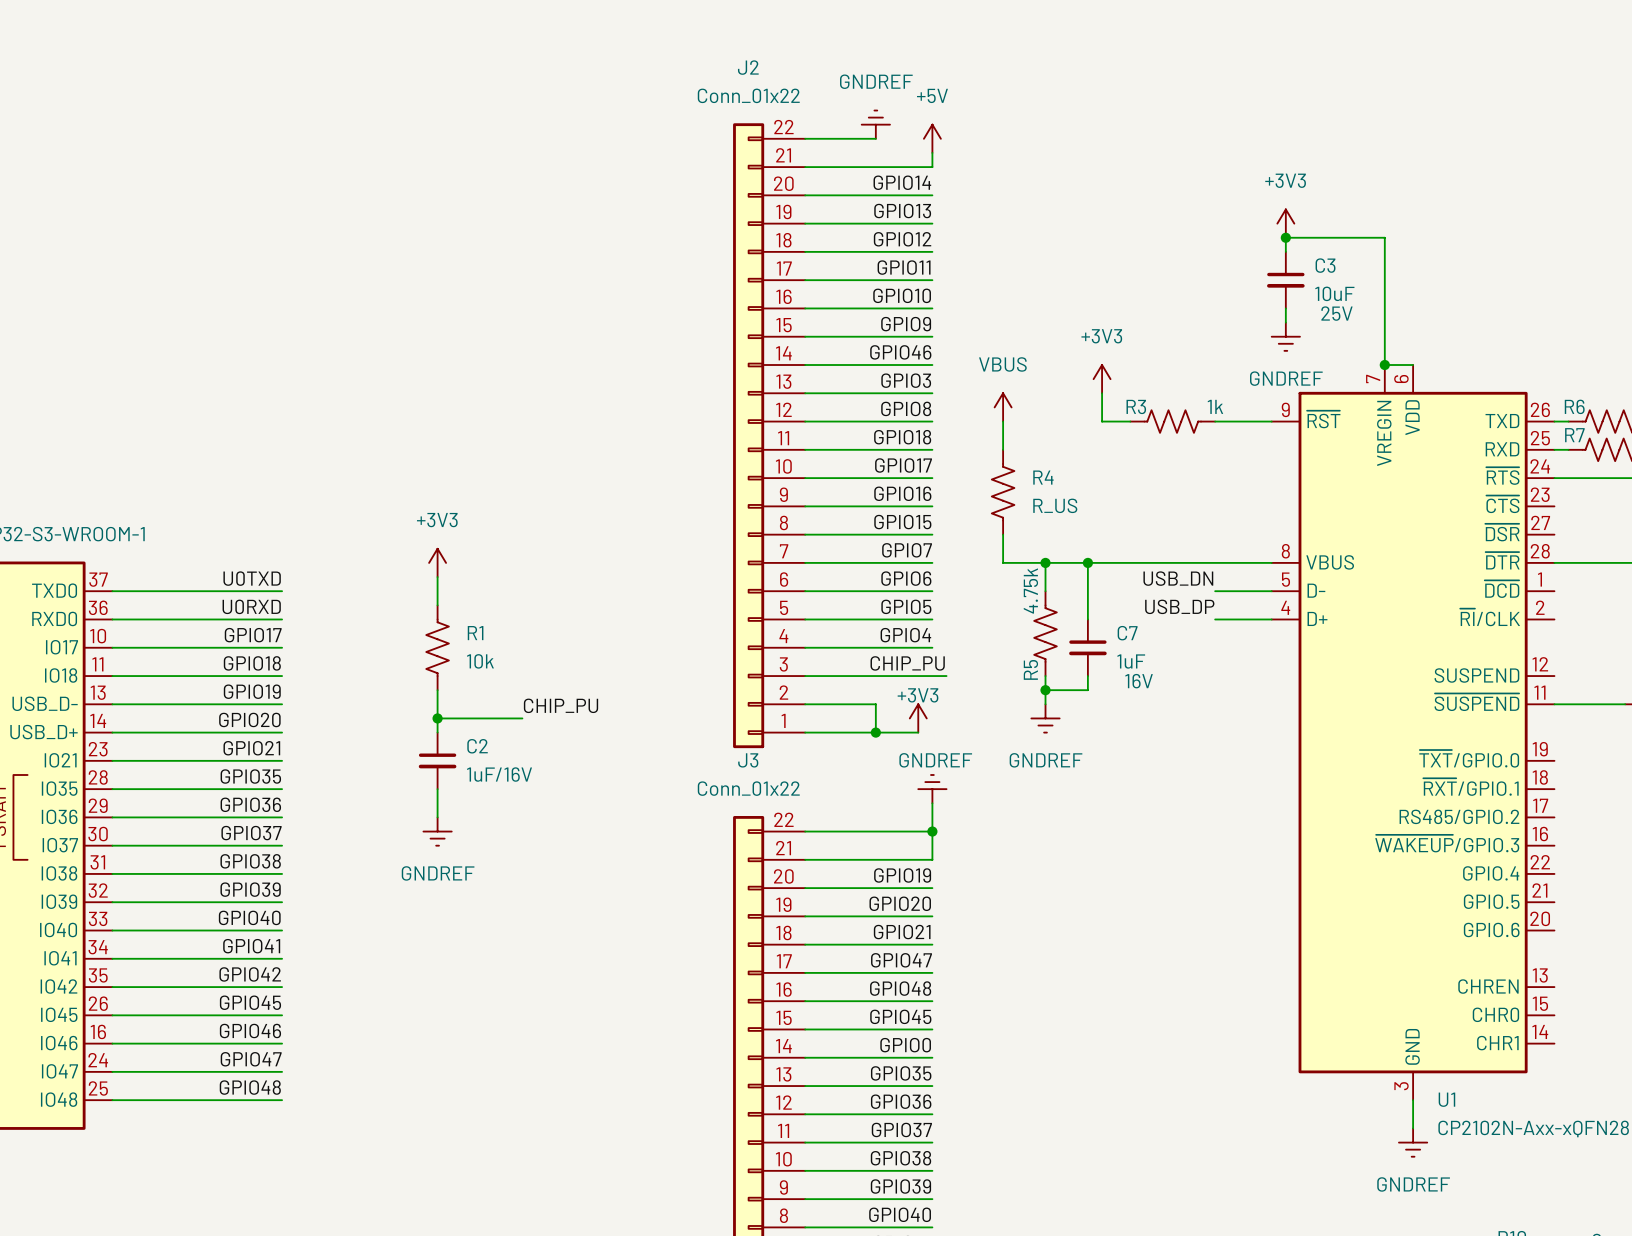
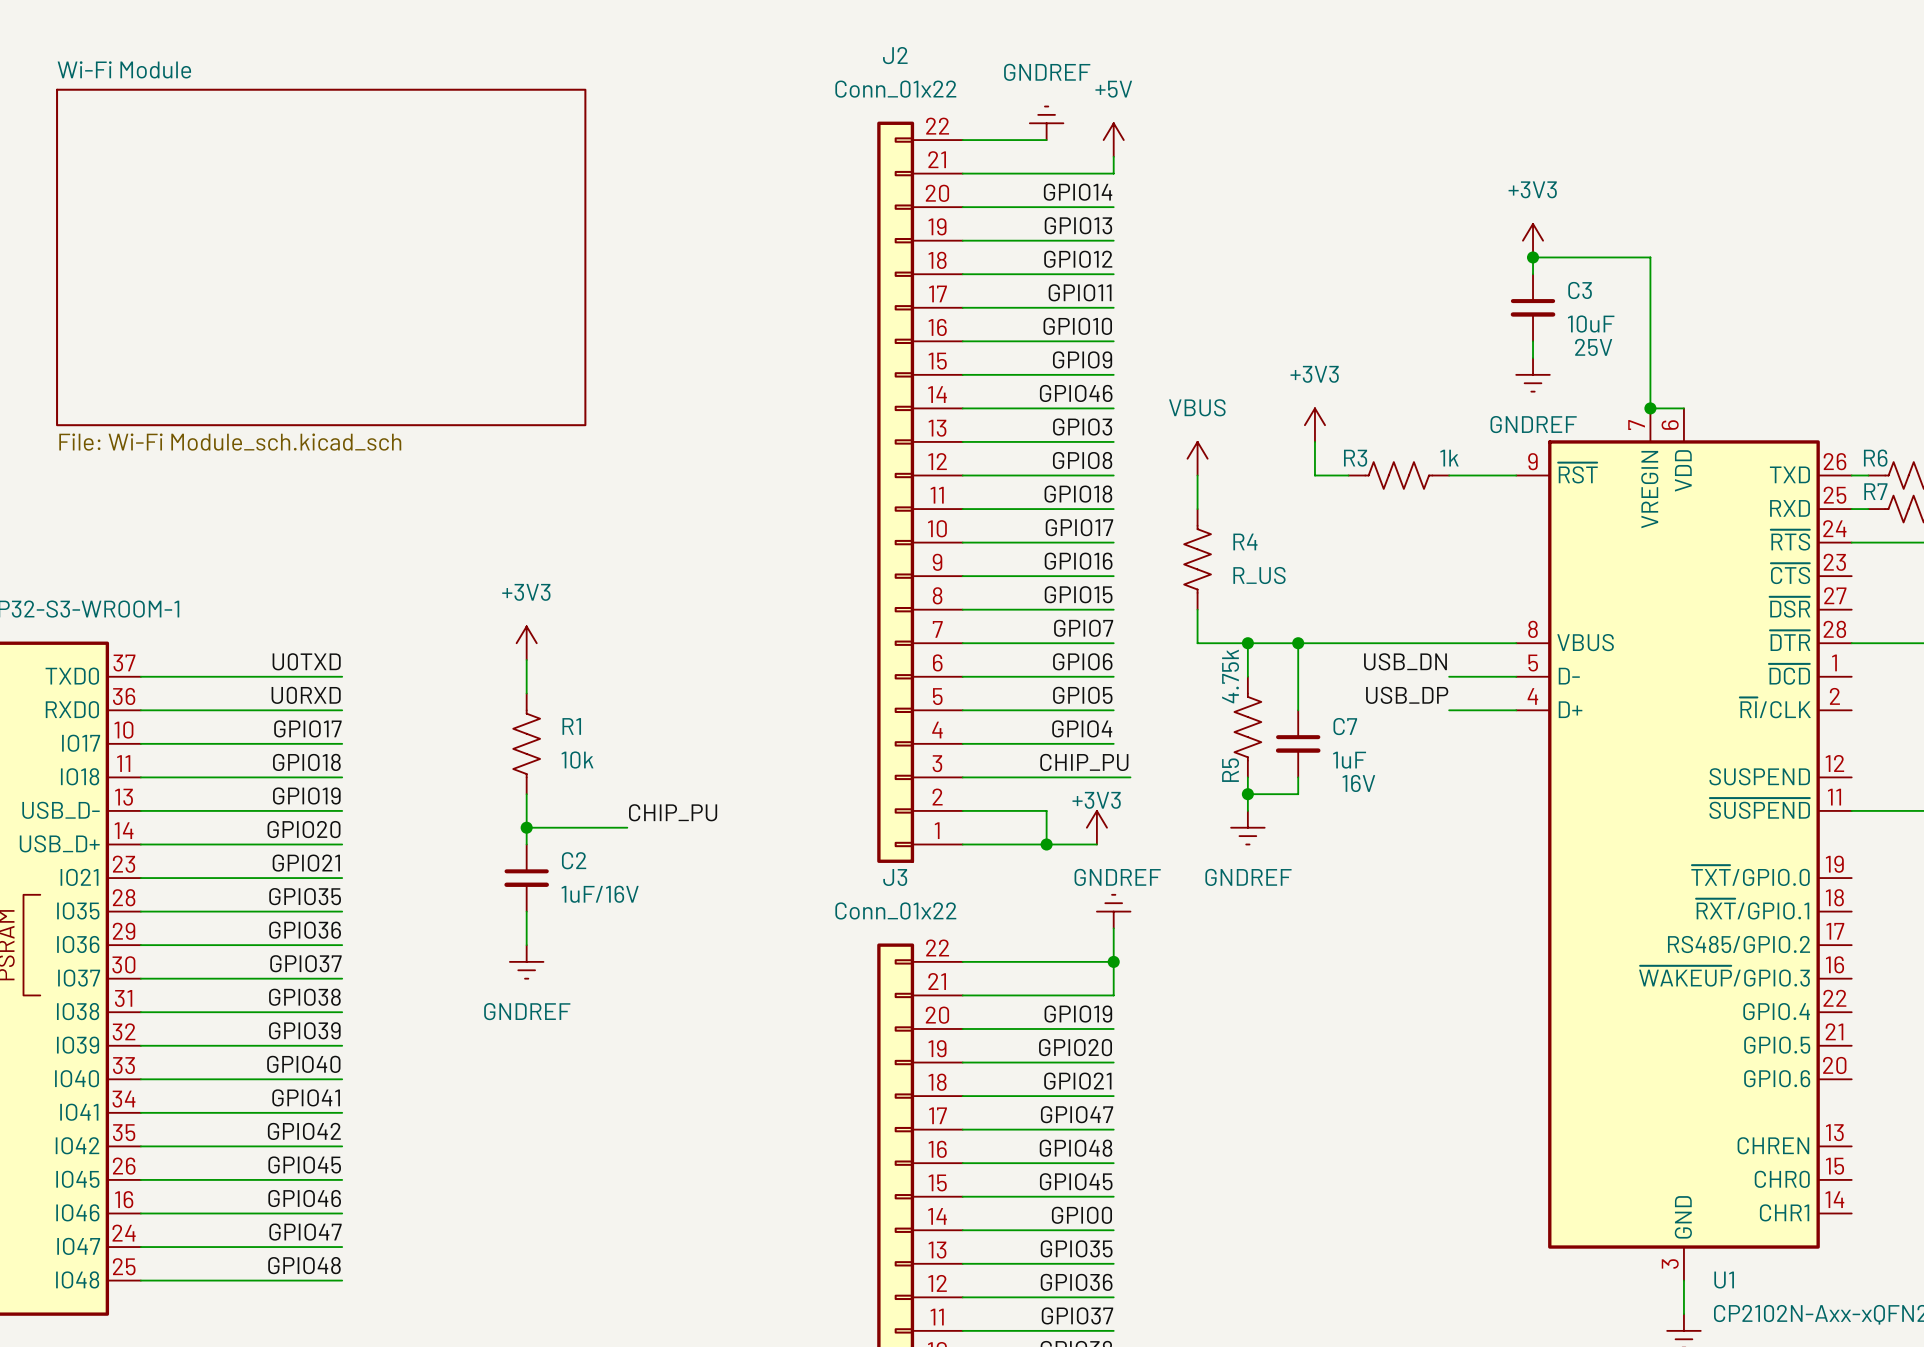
sheet Wi-Fi Module: none -> File: Wi-Fi Module_sch.kicad_sch (321, 257)

